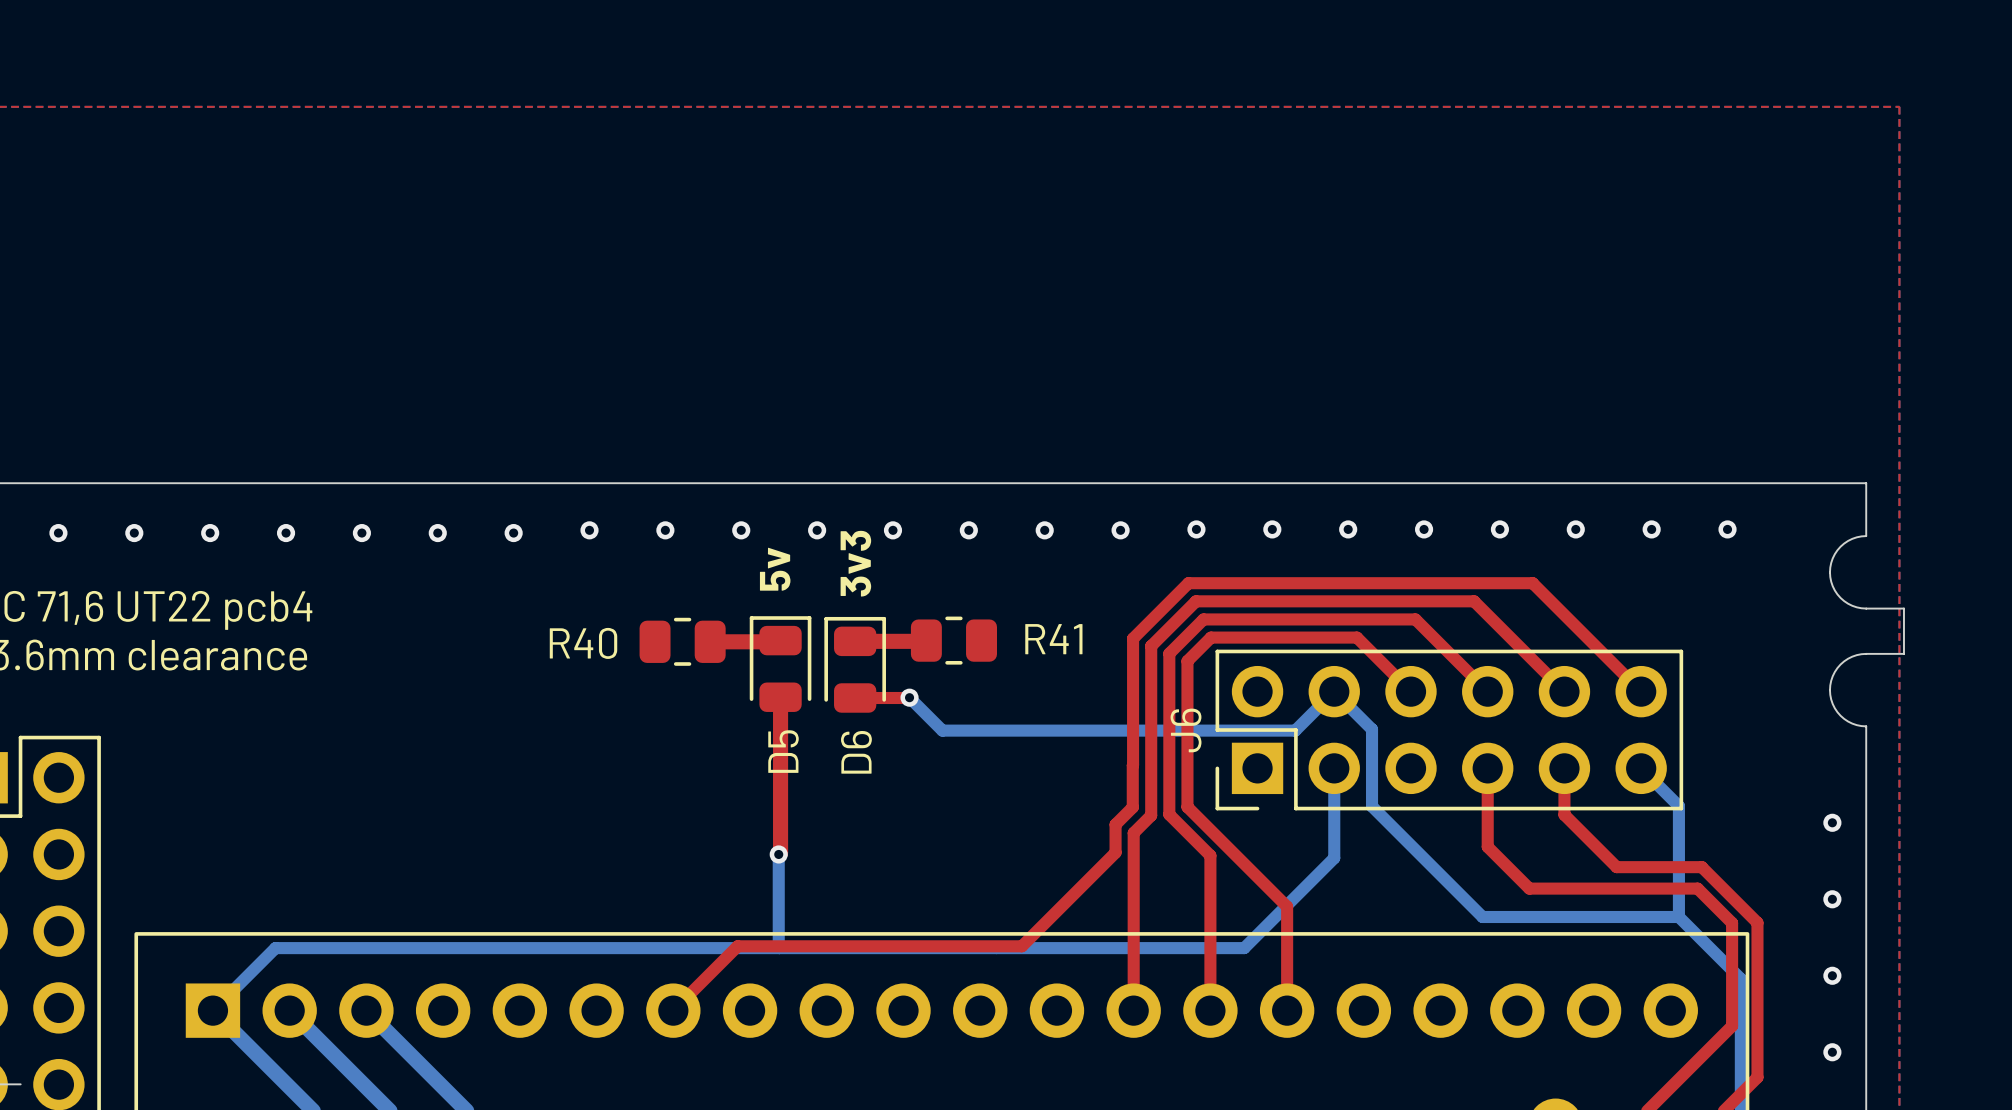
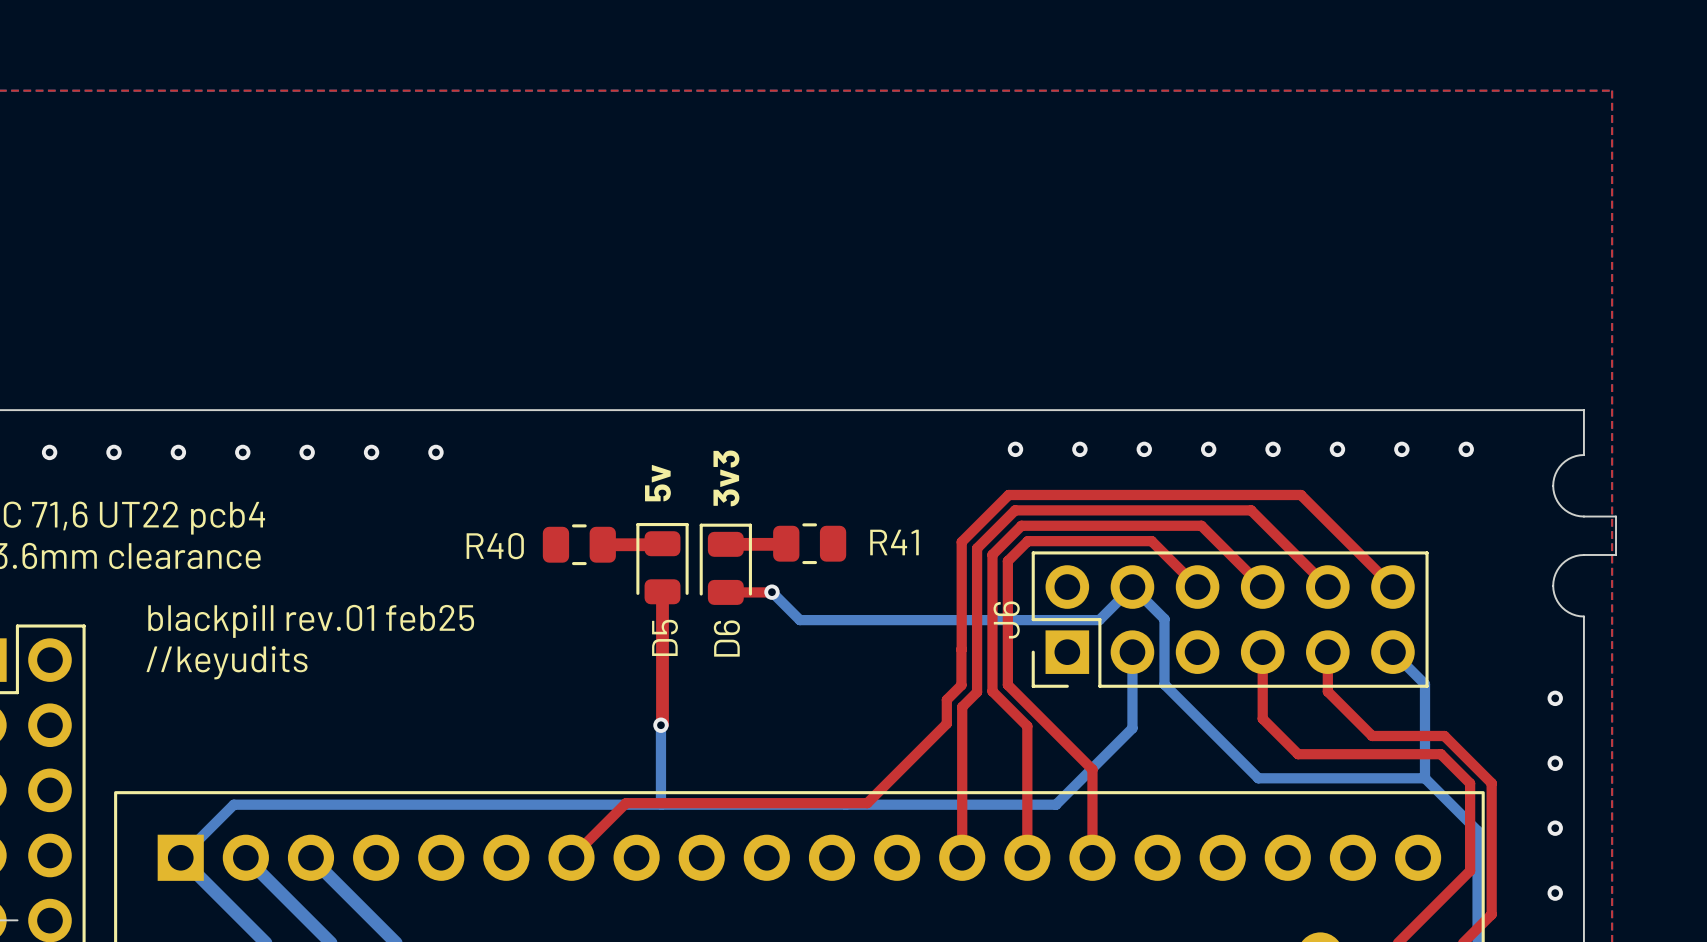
via: (589, 530) -> none
via: (665, 530) -> none
via: (741, 530) -> none
via: (817, 530) -> none
via: (892, 530) -> none
via: (968, 530) -> none
via: (1044, 530) -> none
via: (1120, 530) -> none
text: none -> blackpill rev.01 feb25 (311, 621)
text: none -> //keyudits (227, 662)

